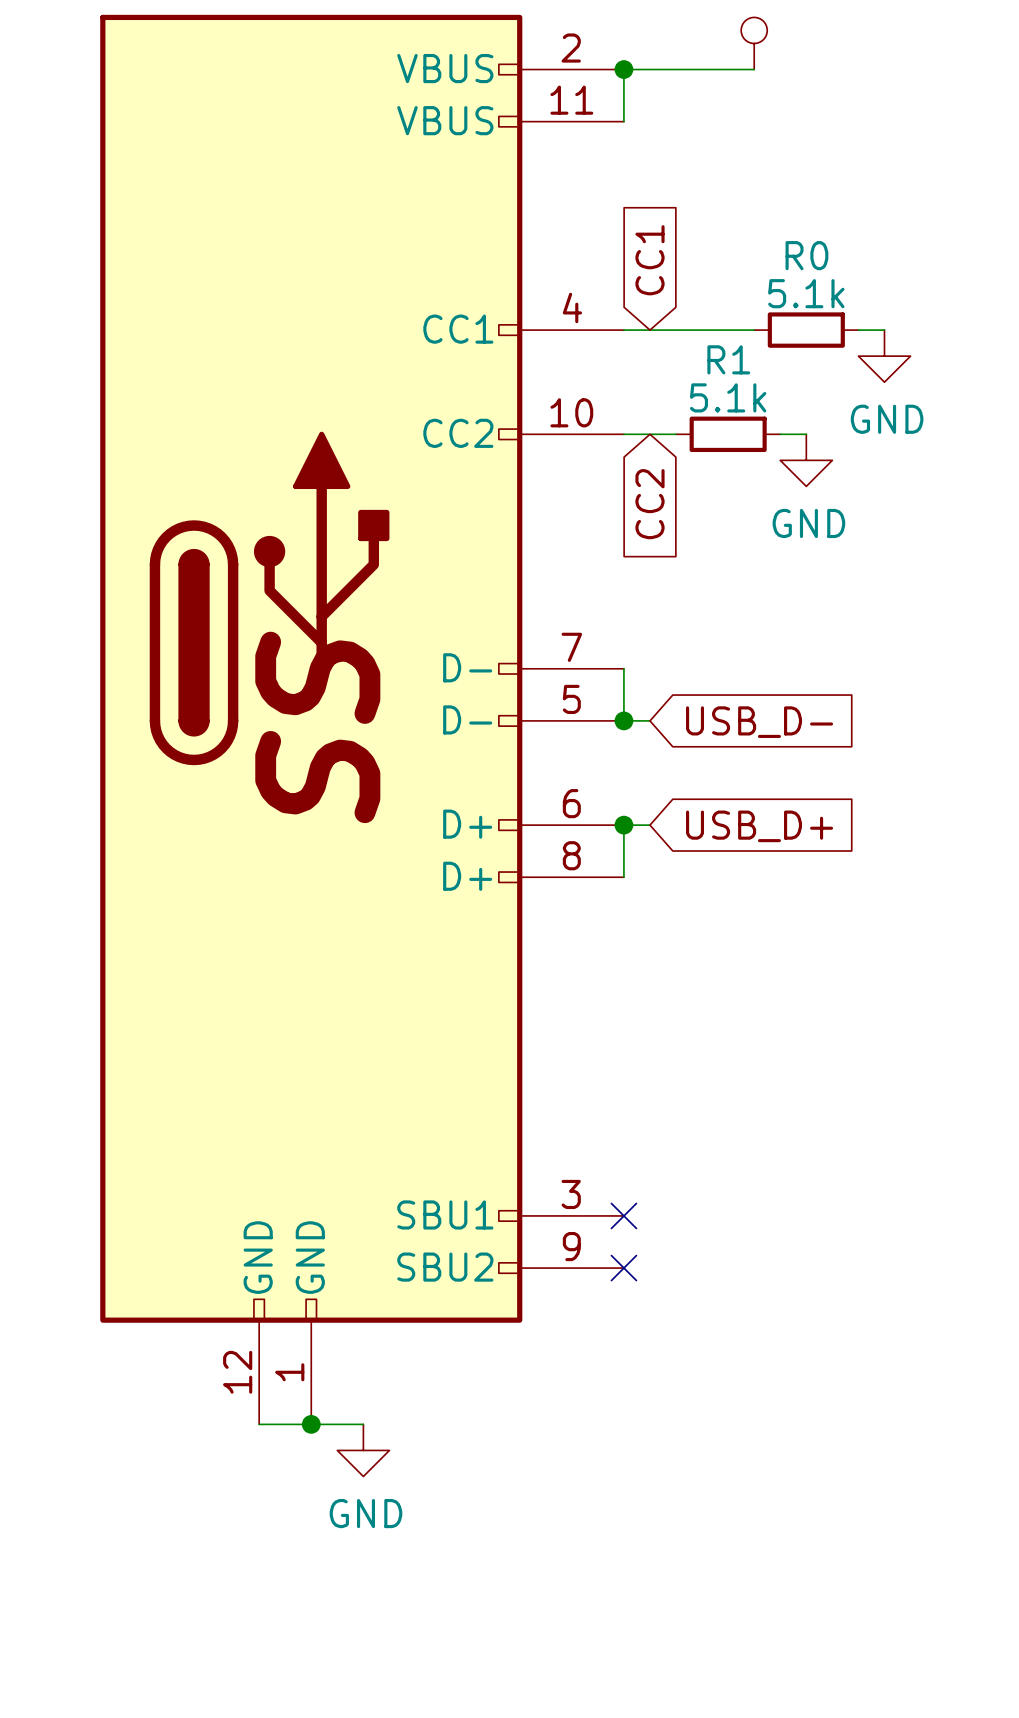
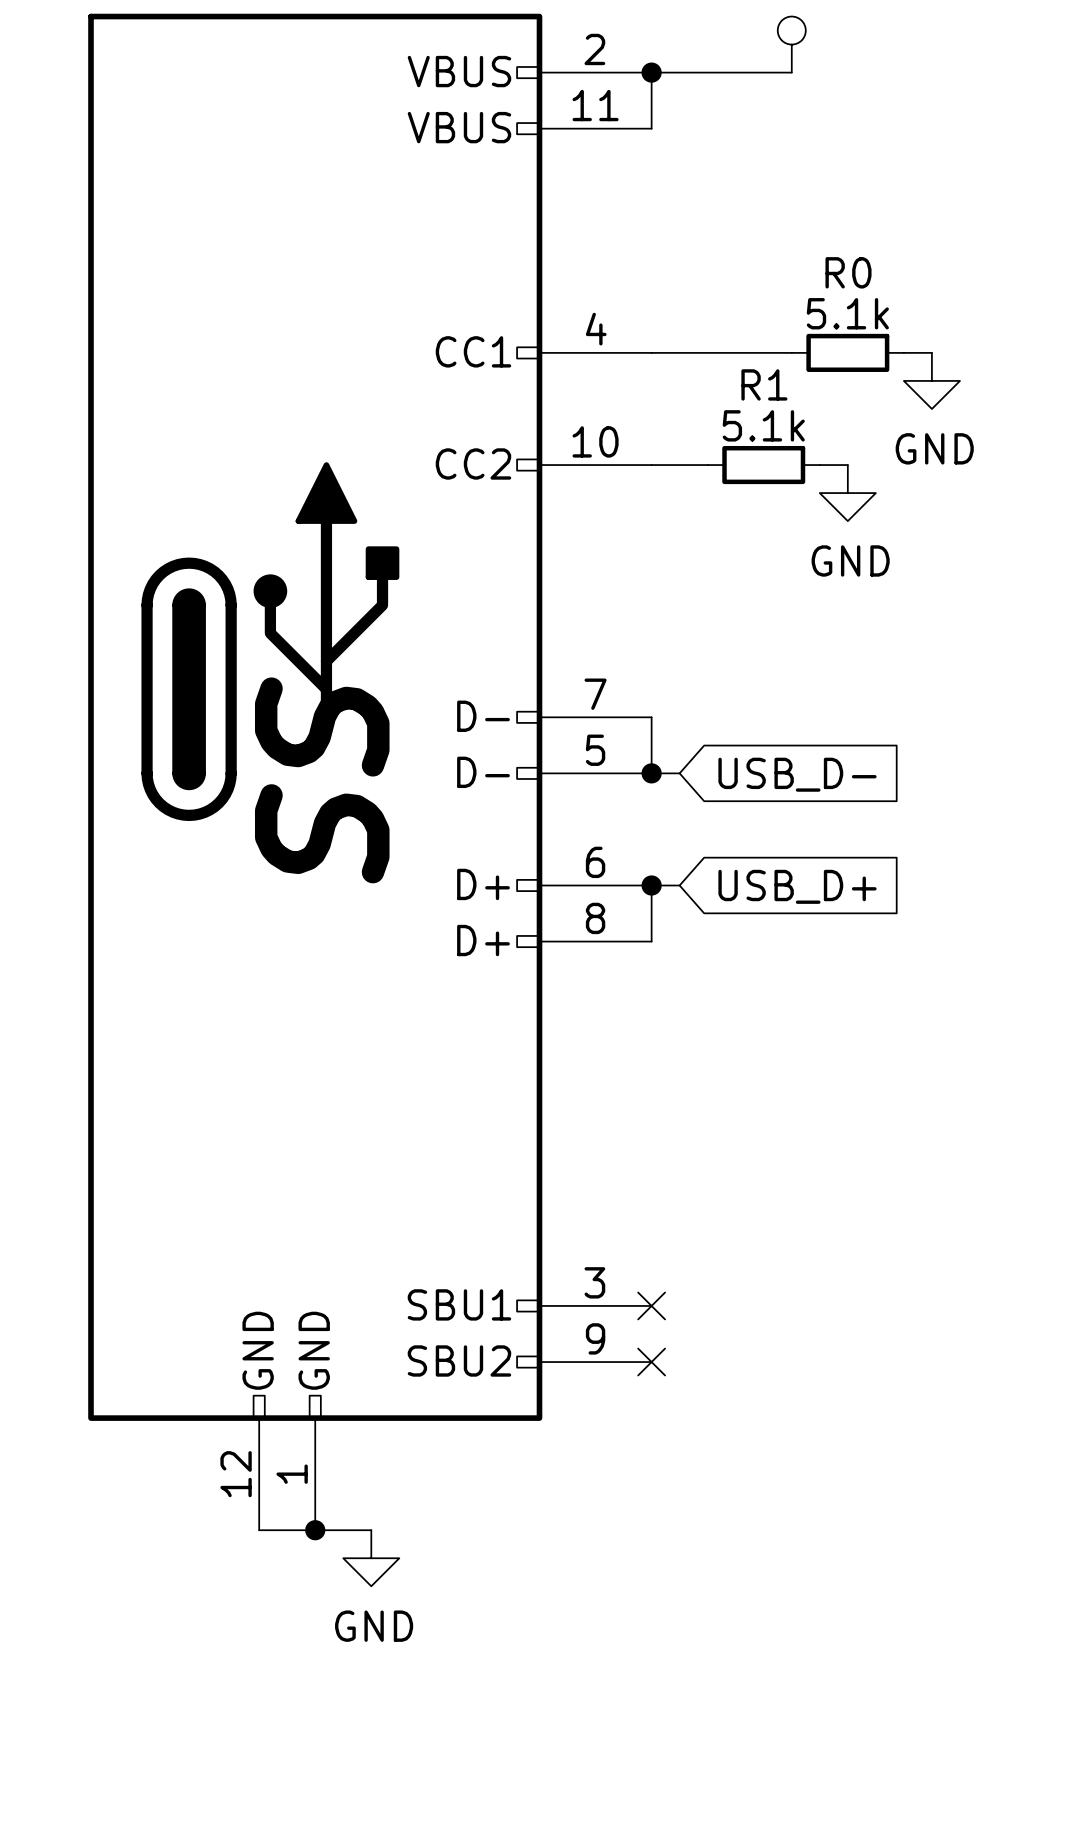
global label: CC1 (649, 260) -> none
global label: CC2 (649, 504) -> none

